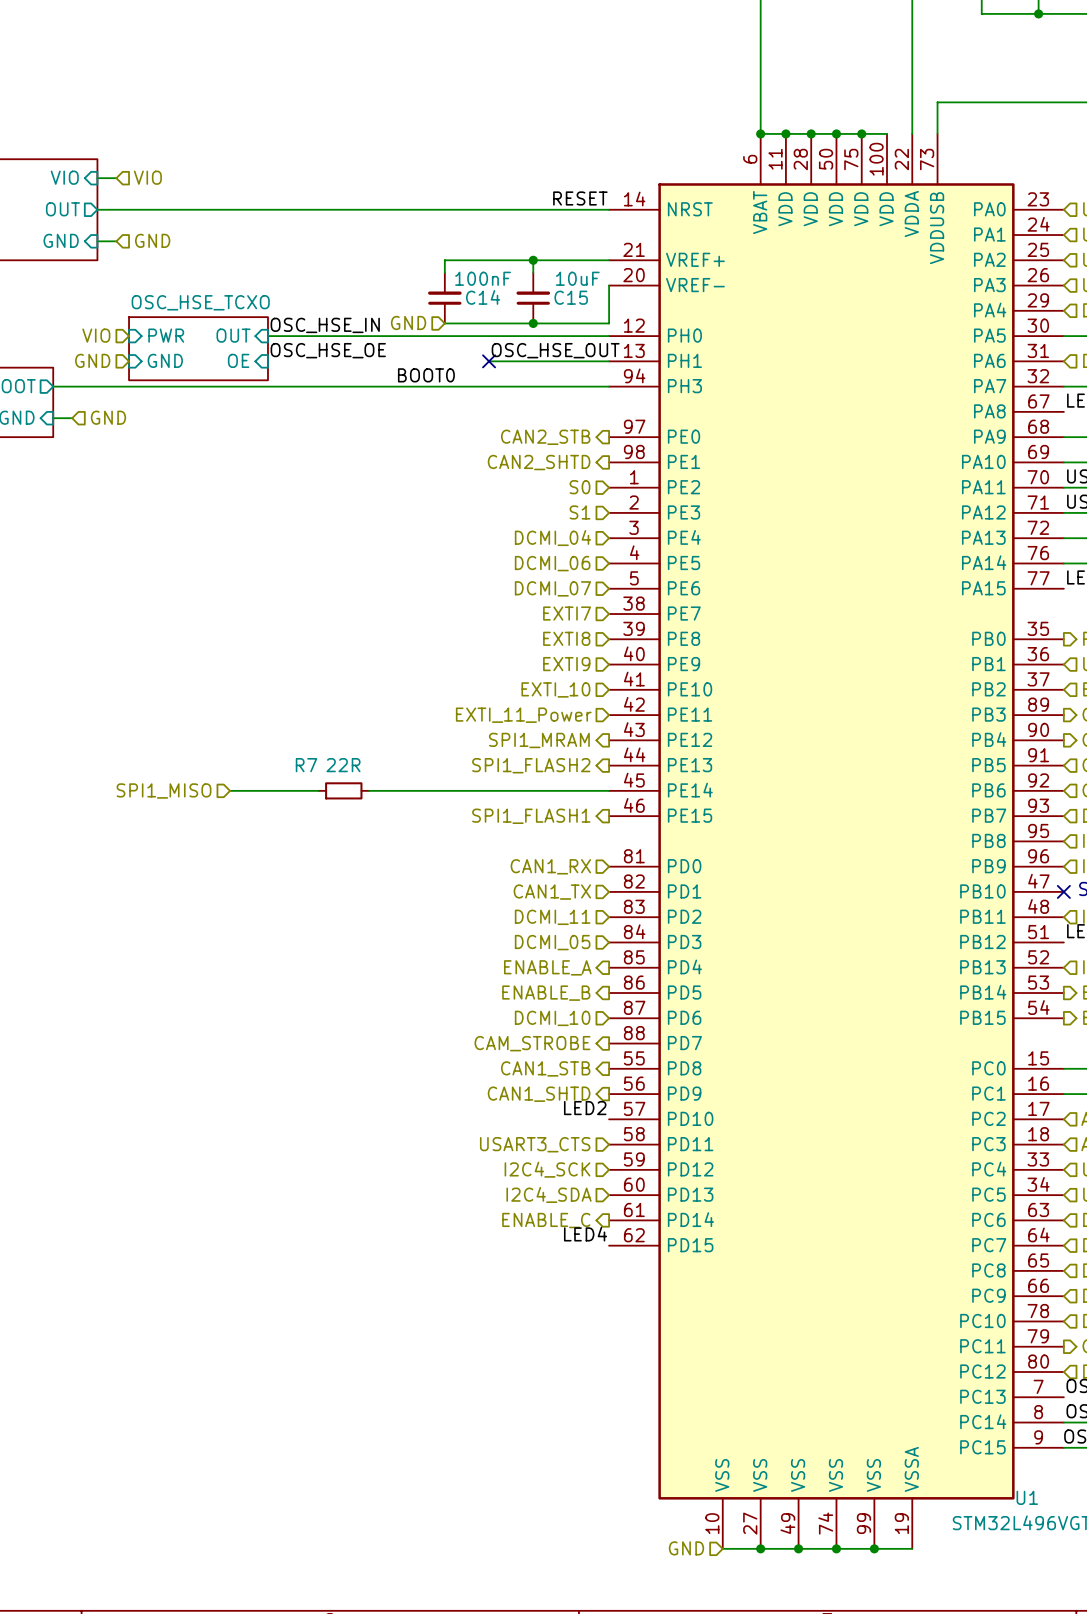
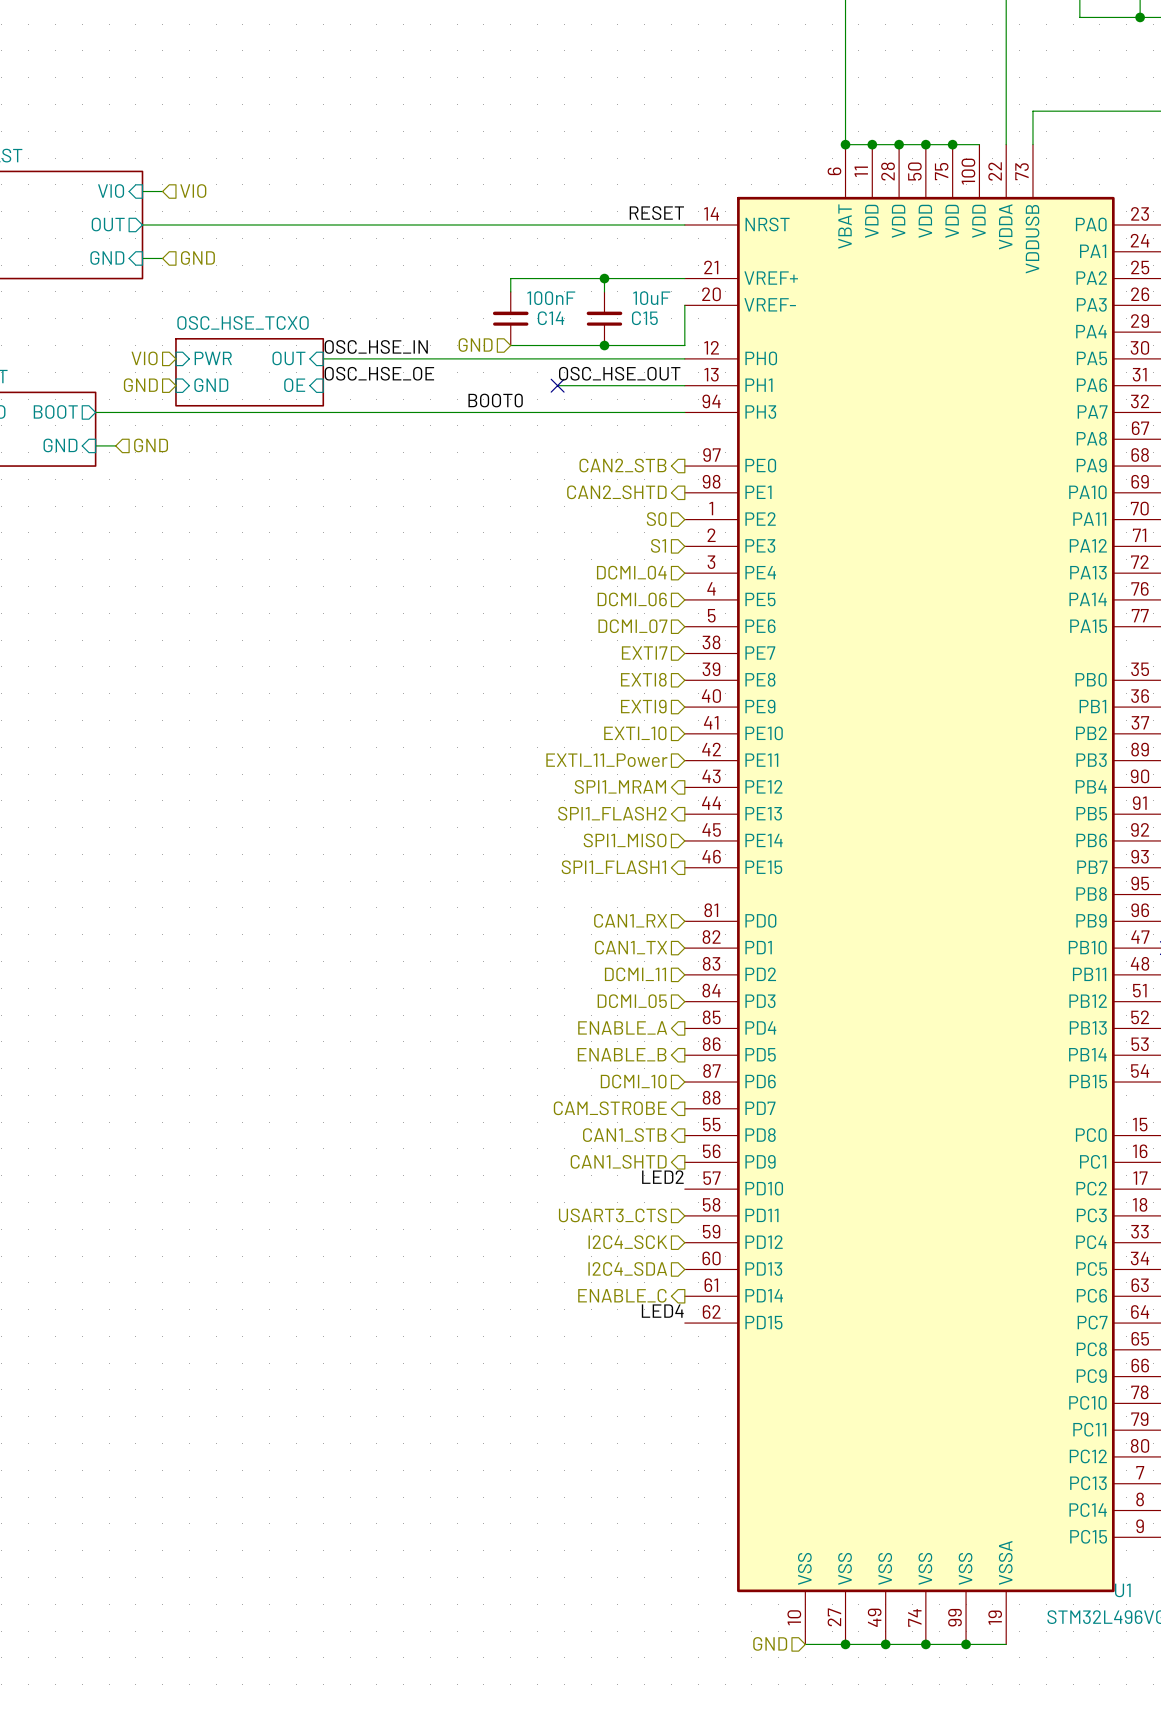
wire: (230, 790) (318, 790) -> none
R7: 22R (343, 790) -> none
wire: (369, 790) (609, 790) -> none
hierarchical label: SPI1_MISO (164, 791) -> none
hierarchical label: none -> SPI1_MISO (625, 840)

